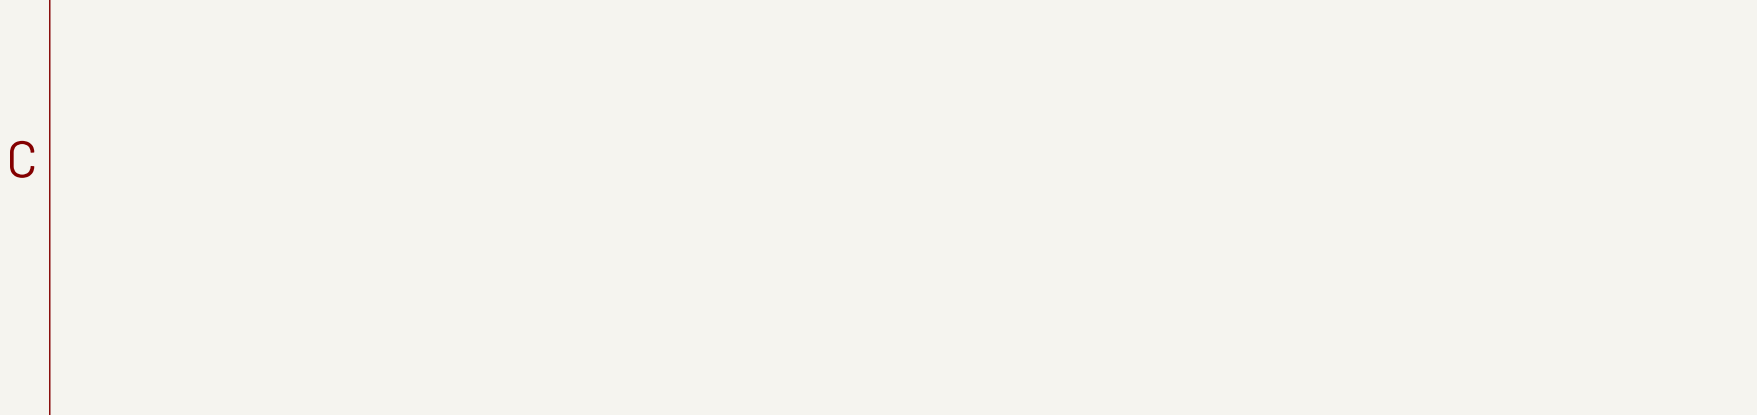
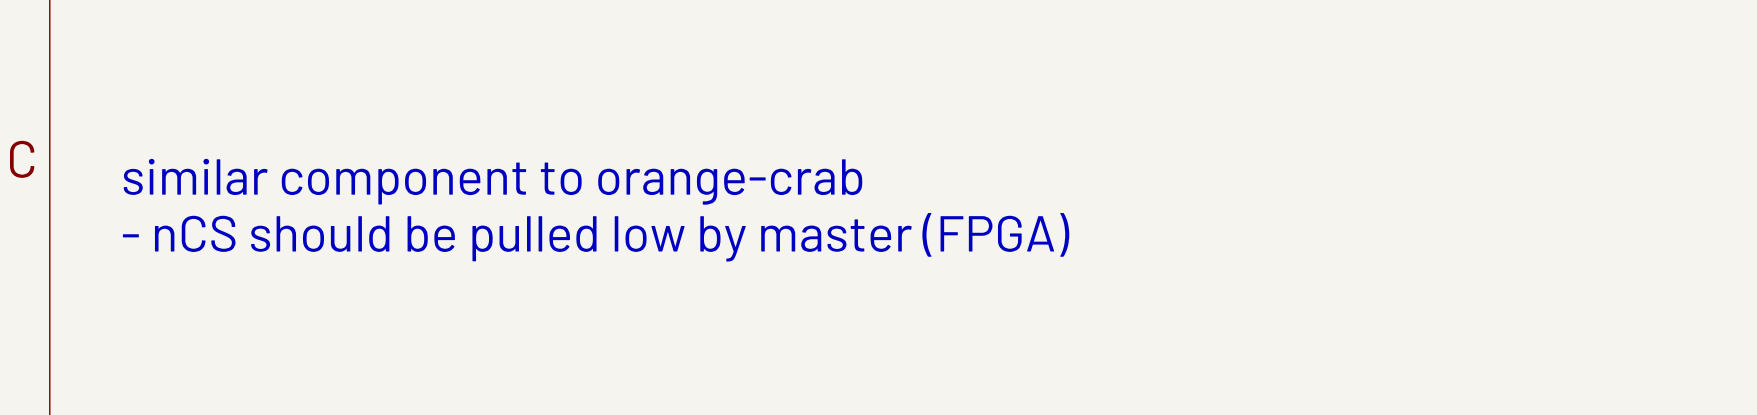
text: none -> similar component to orange-crab (493, 181)
text: none -> - nCS should be pulled low by master (FPGA) (596, 237)

